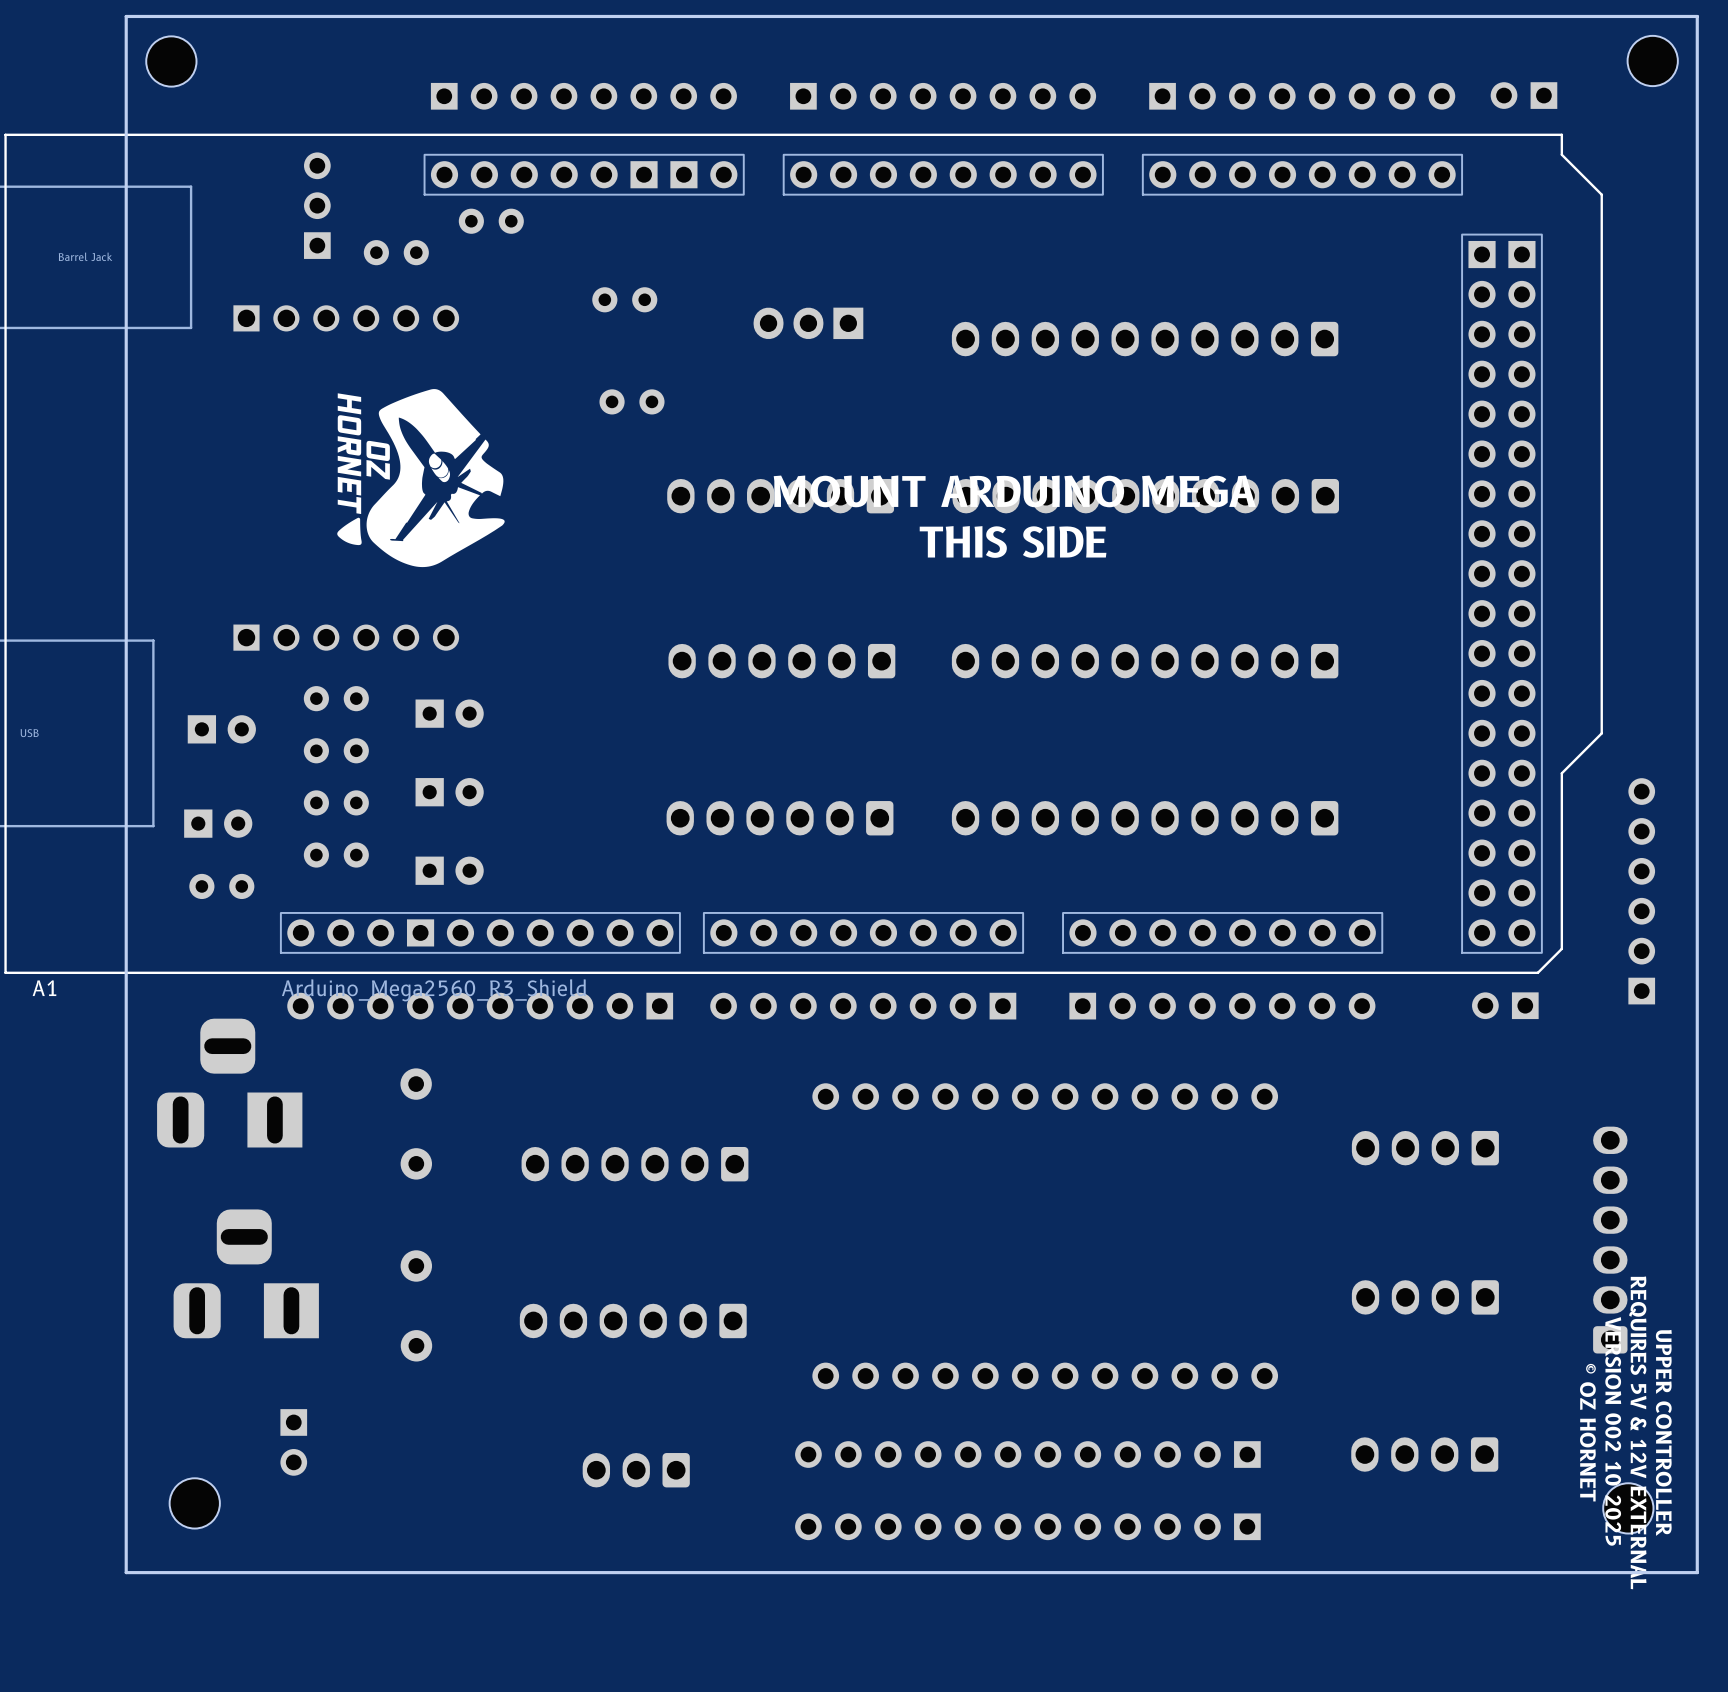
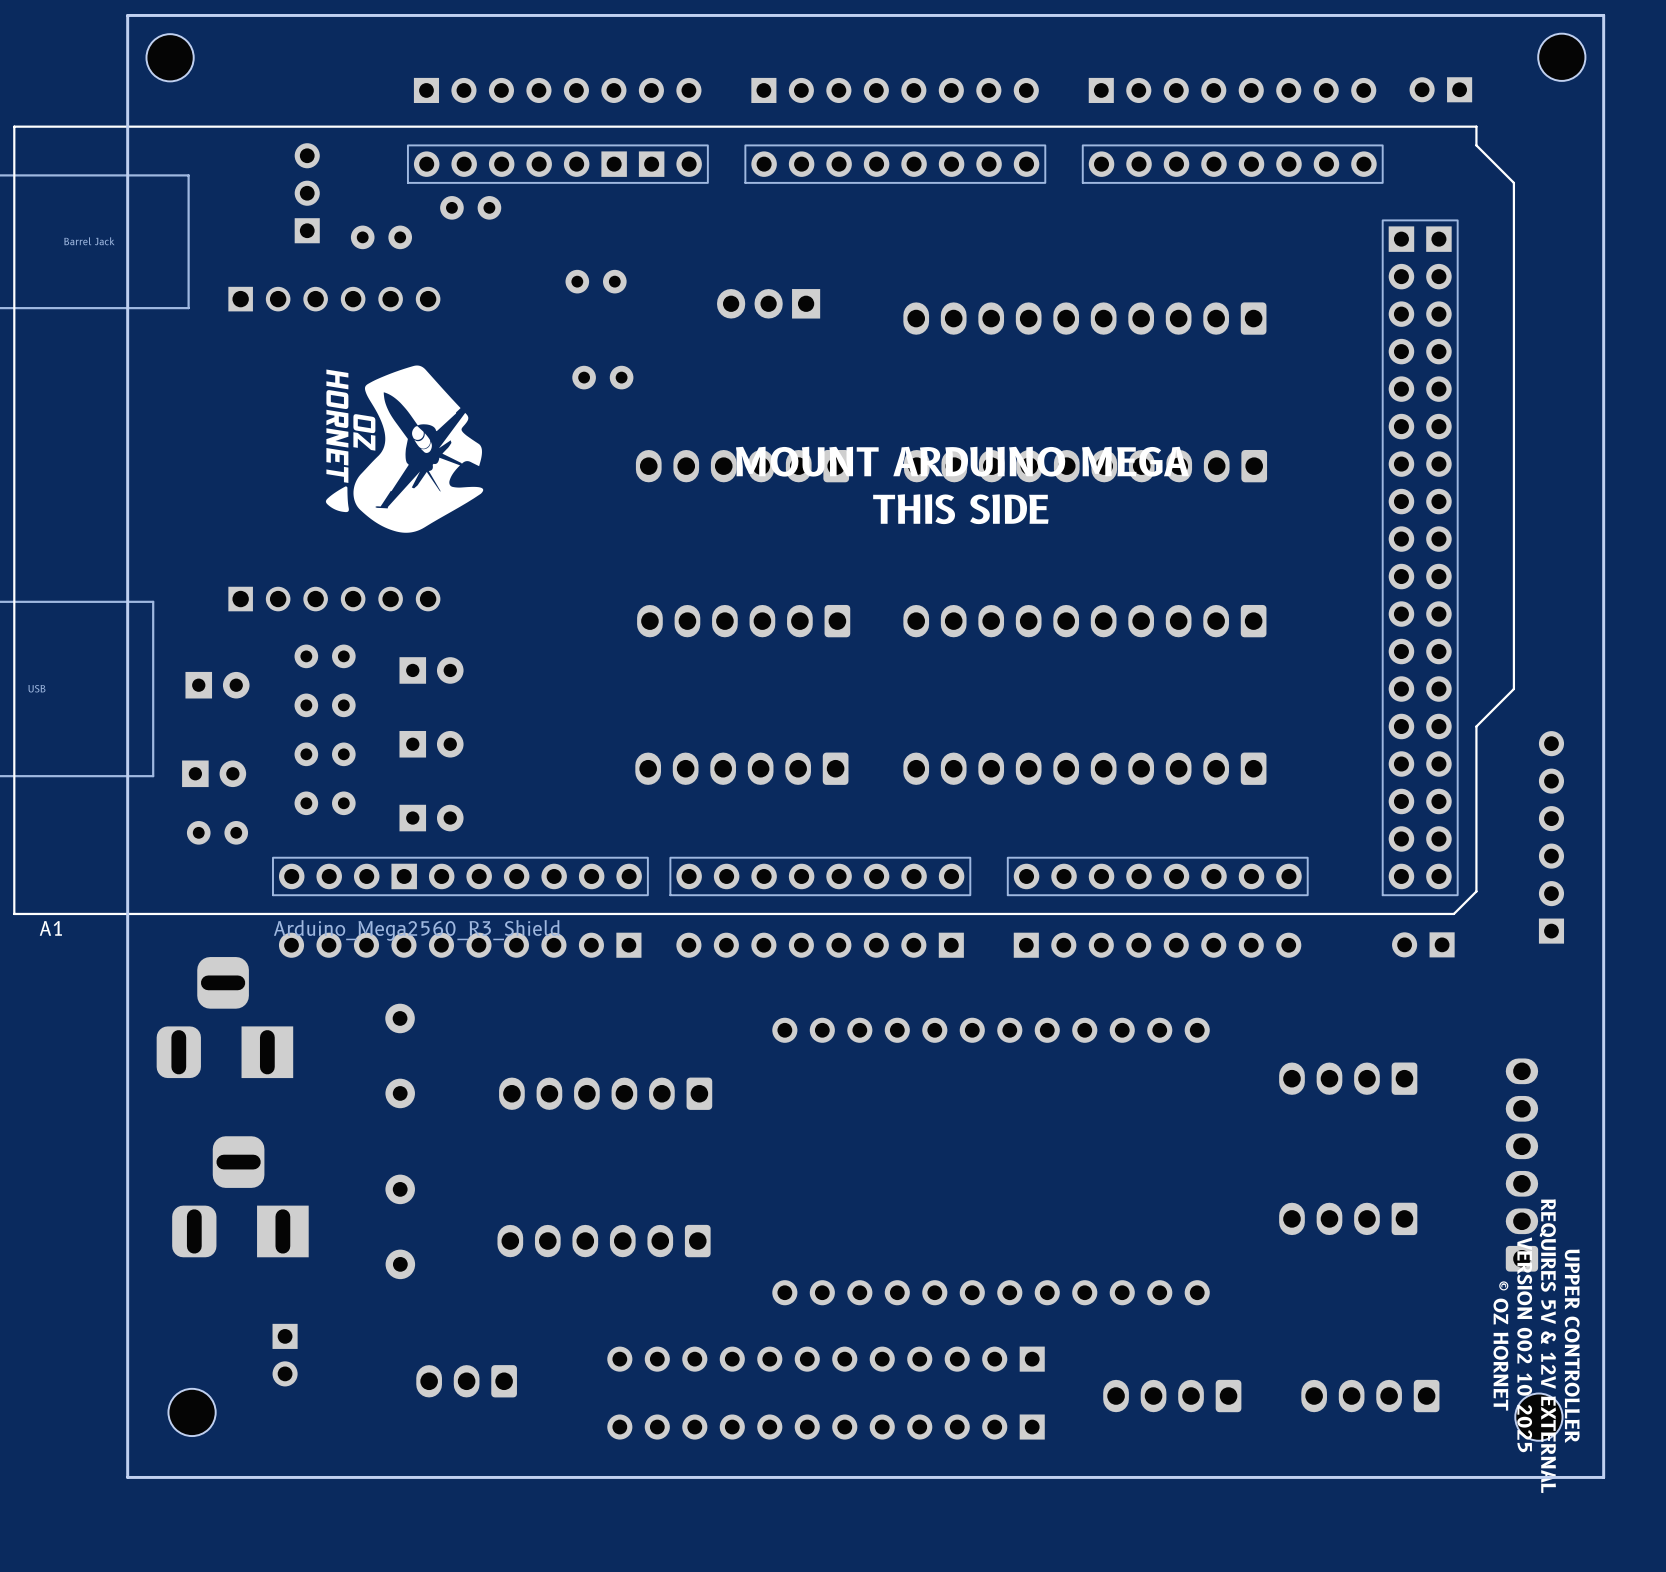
part: none -> (826, 1359)
part: (1027, 1454) -> none
part position: (1424, 1454) -> (1370, 1396)
part position: (636, 1470) -> (466, 1381)
part: none -> (1172, 1396)
part: none -> (826, 1427)
part: (1027, 1526) -> none

